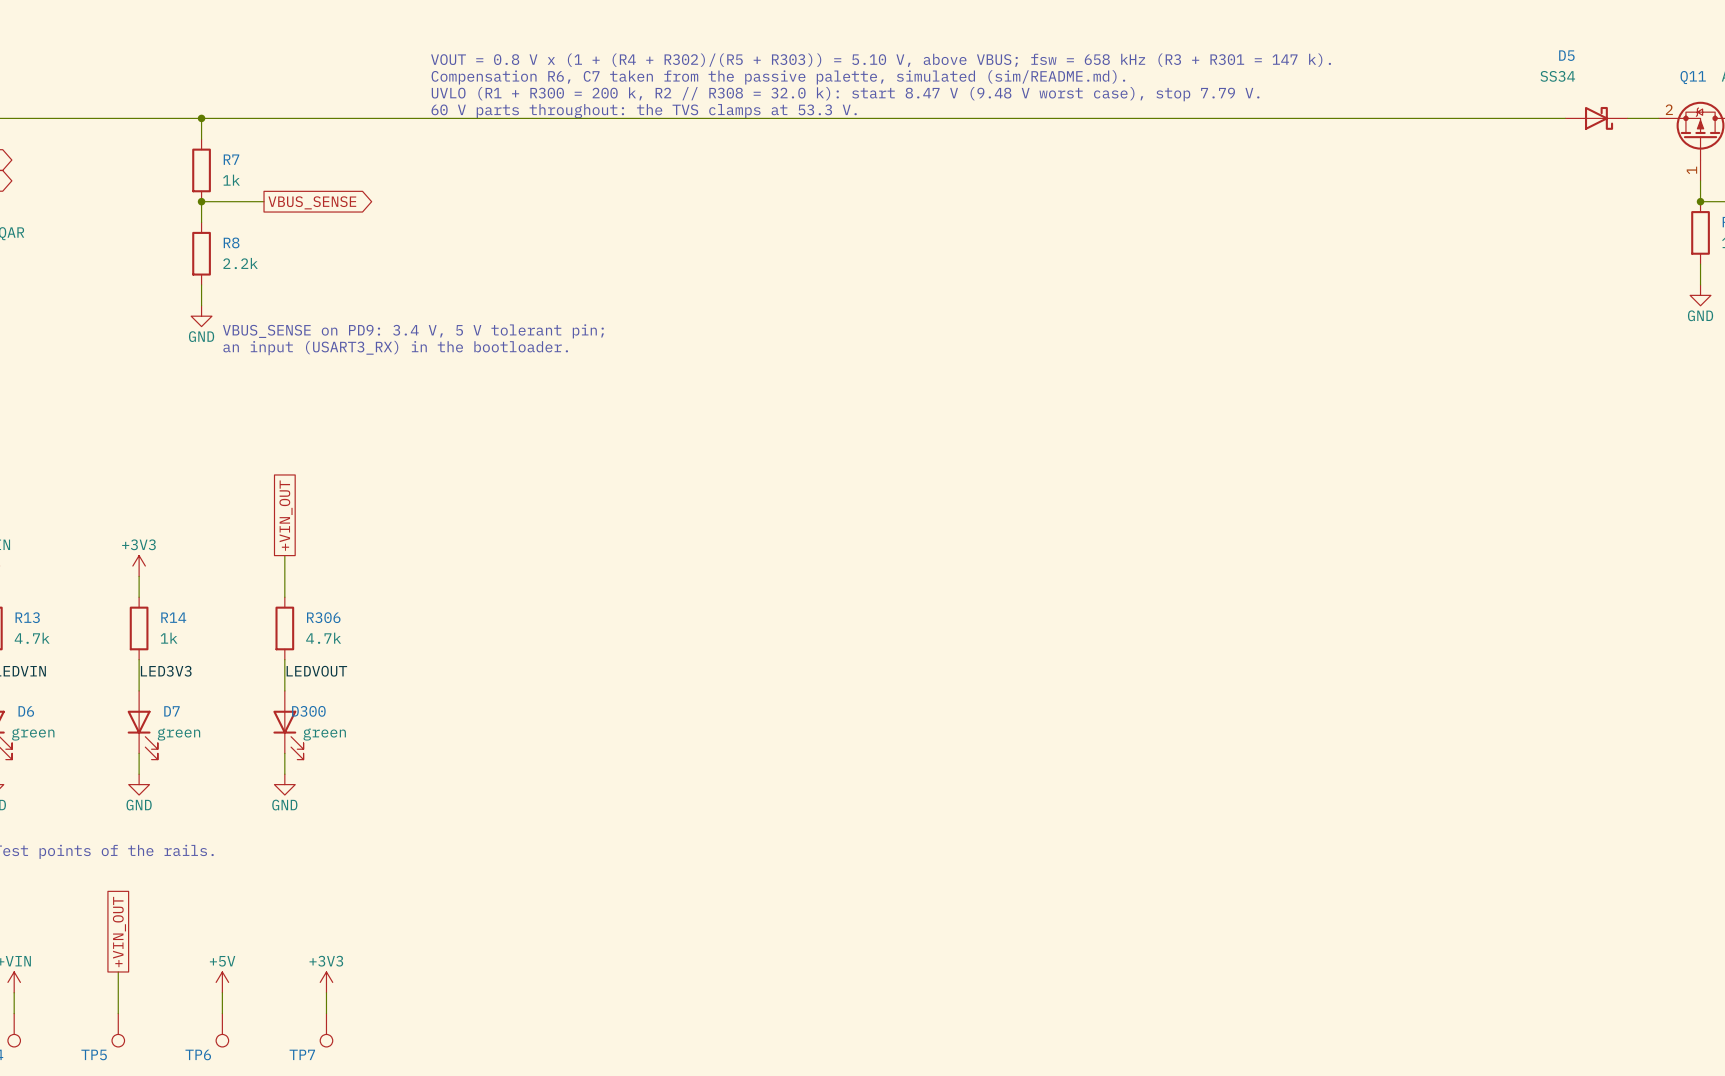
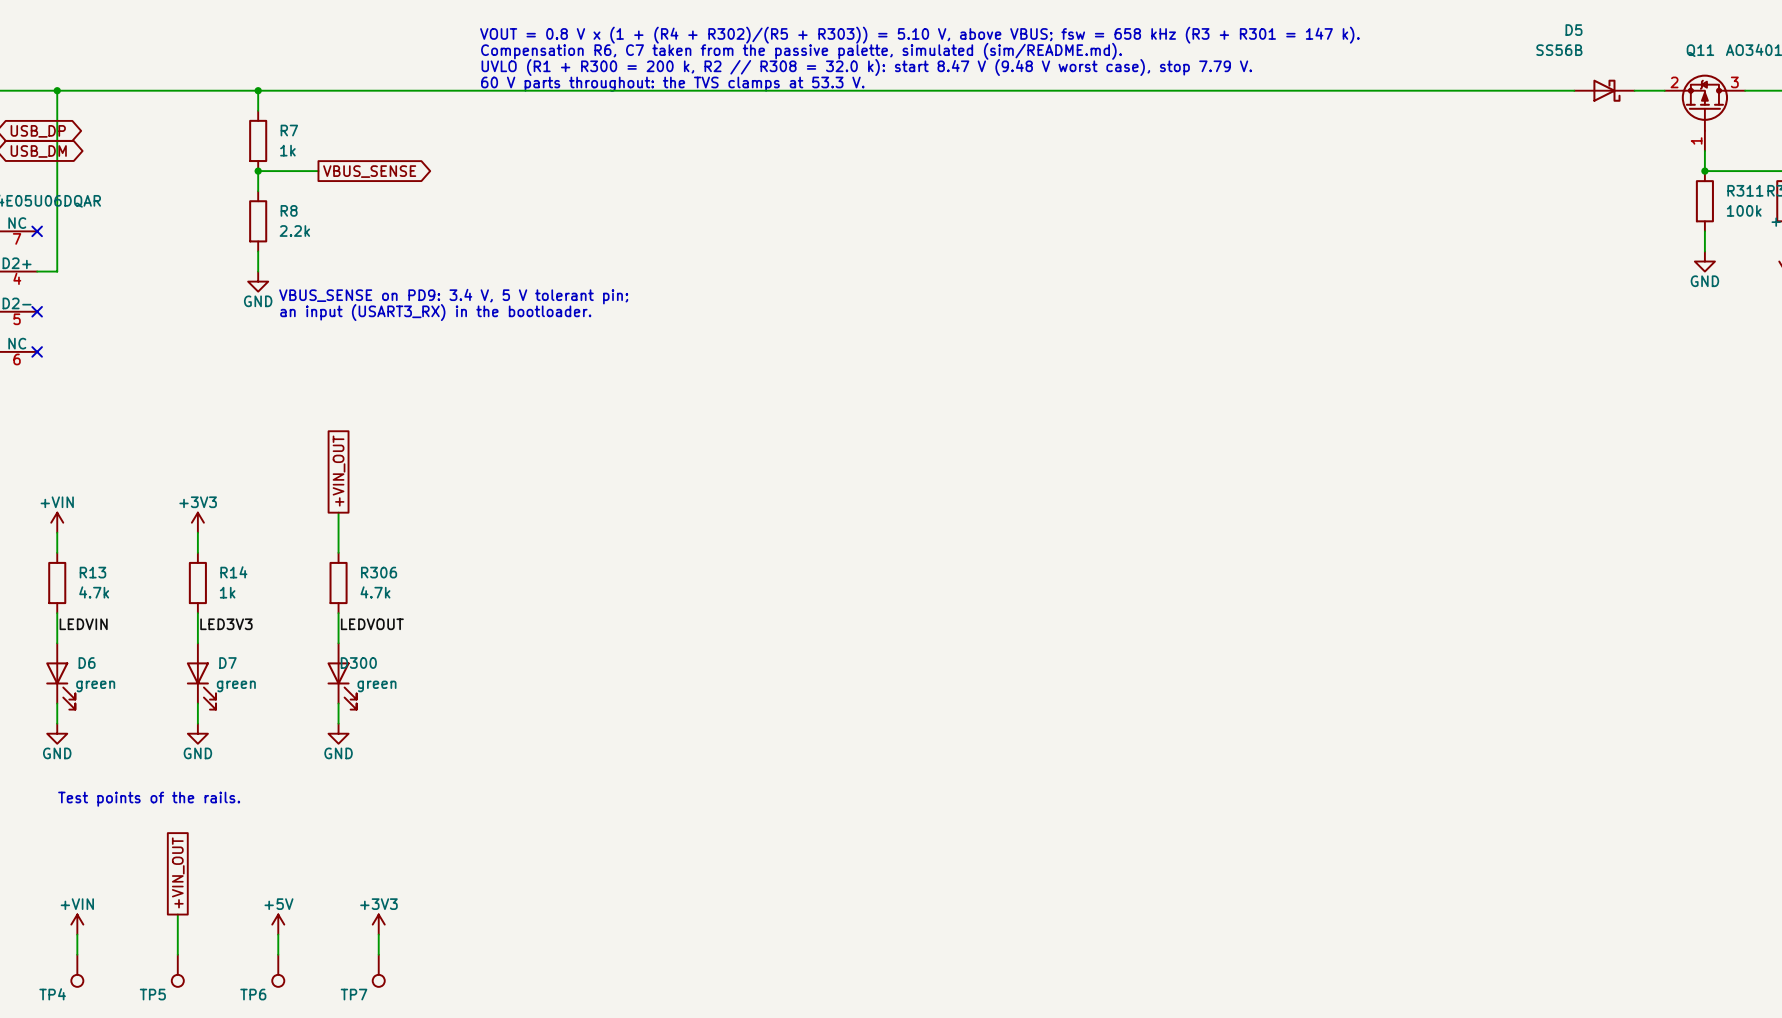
D5 value: SS34 (1557, 76) -> SS56B (1559, 50)

